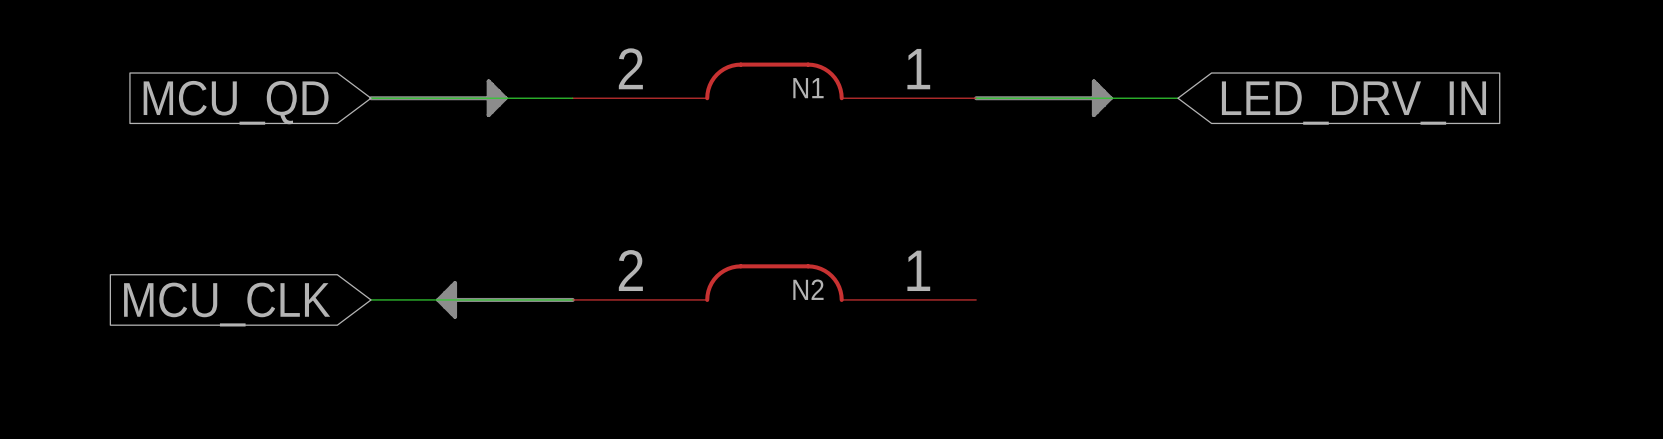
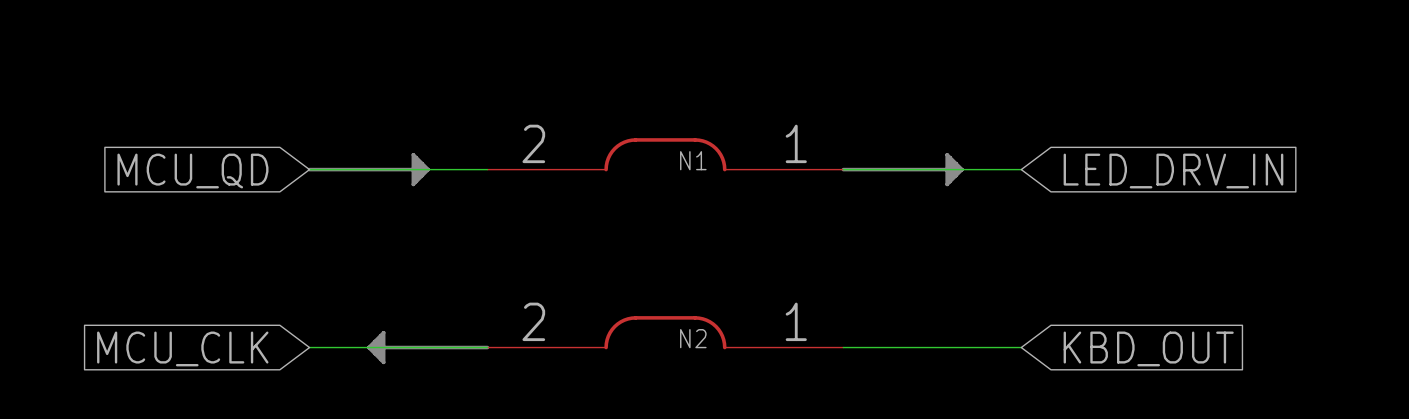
wire: none -> (843, 347) (1021, 347)
global label: none -> KBD_OUT (1148, 348)

